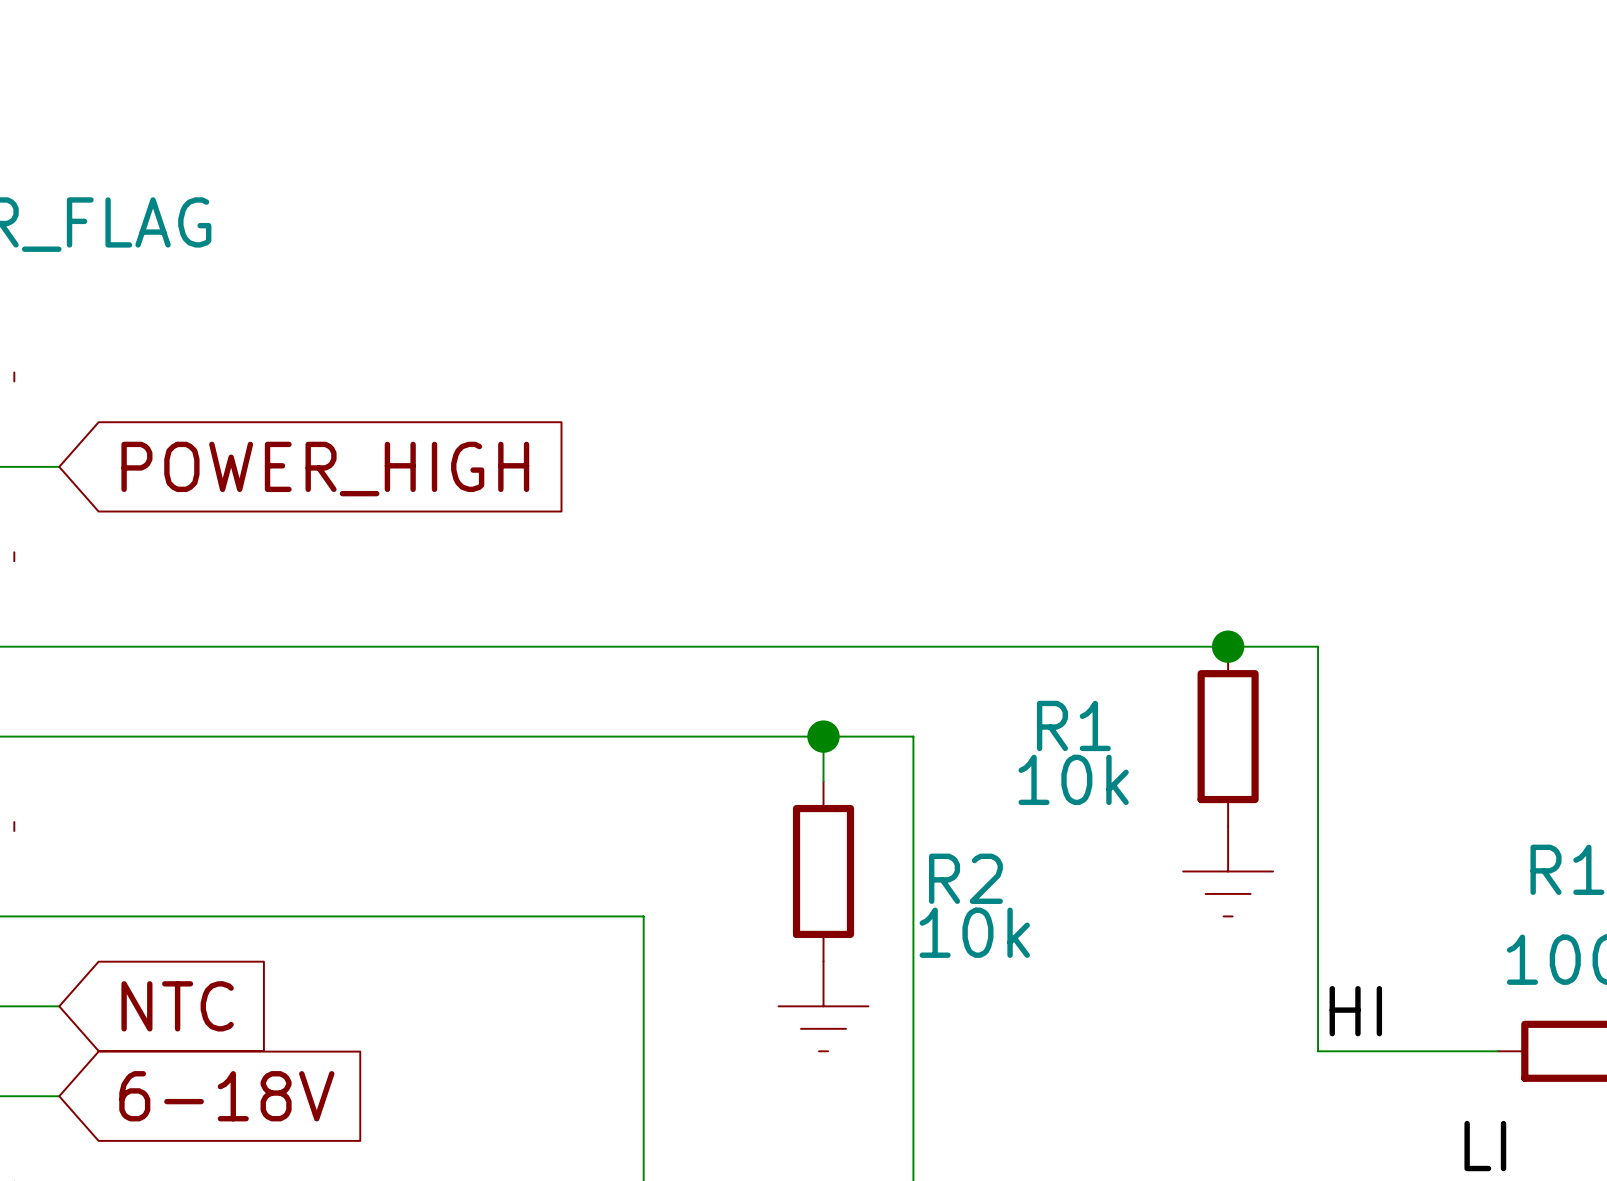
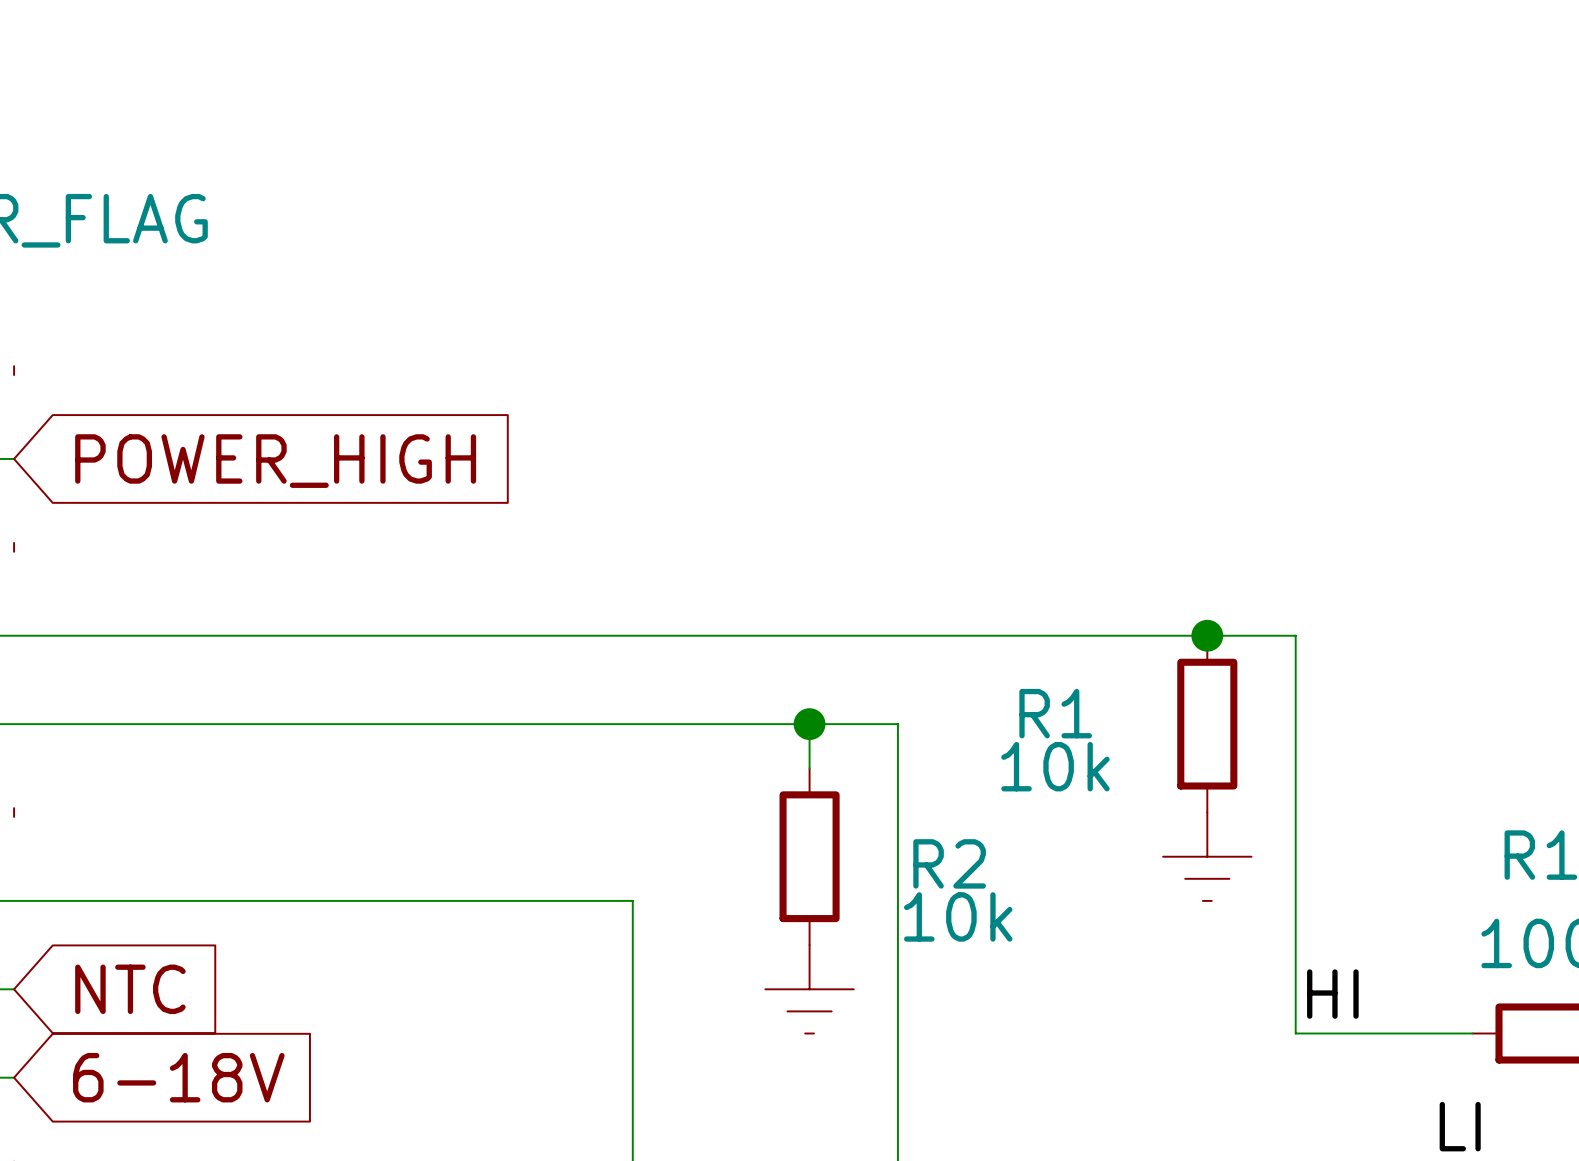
wire: (14, 466) (59, 466) -> none
global label position: POWER_HIGH (325, 469) -> POWER_HIGH (275, 461)
wire: (14, 1006) (59, 1006) -> none
global label position: NTC (177, 1006) -> NTC (130, 989)
wire: (14, 1096) (59, 1096) -> none
global label position: 6-18V (226, 1096) -> 6-18V (178, 1077)

